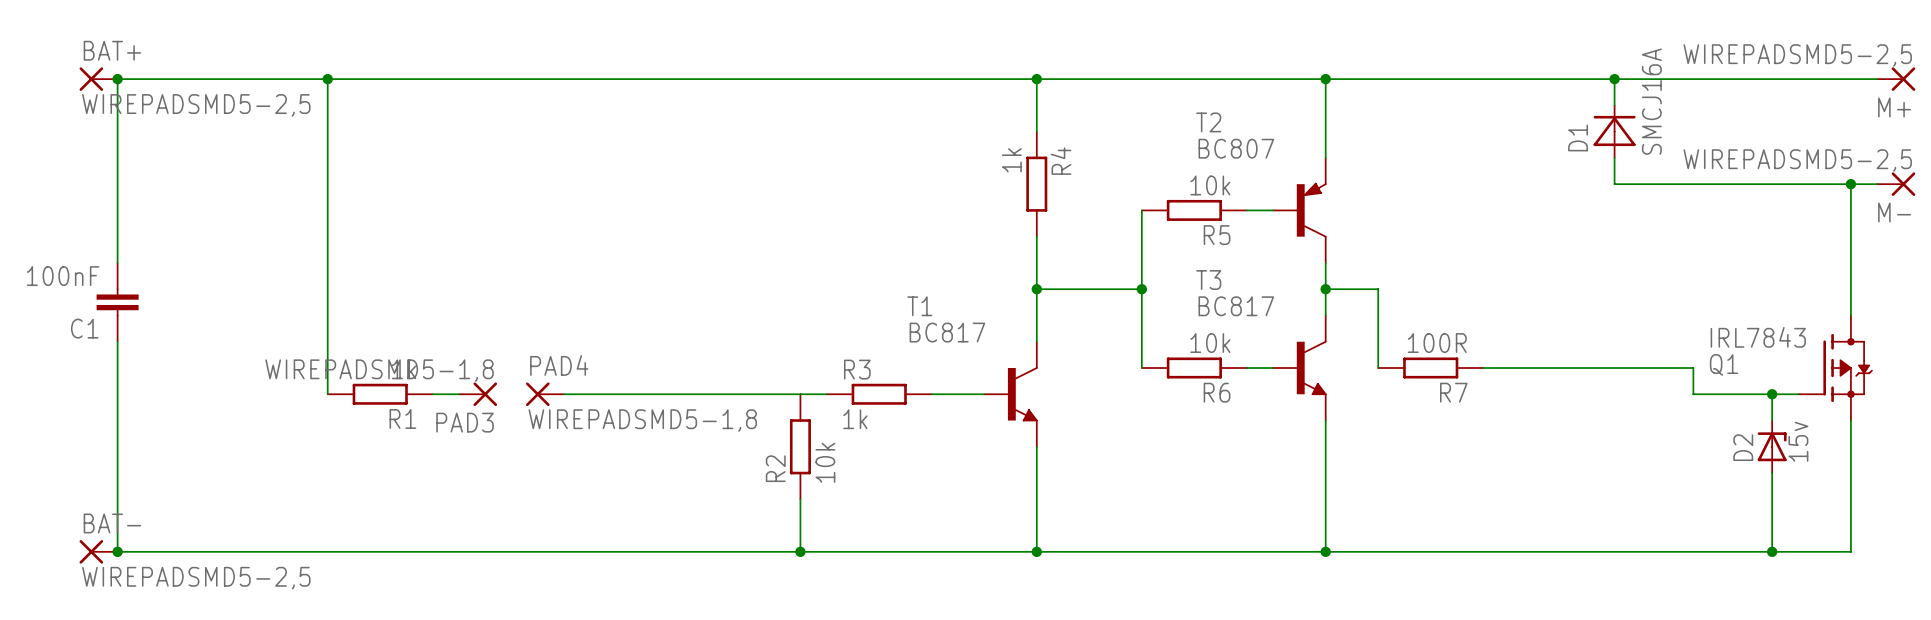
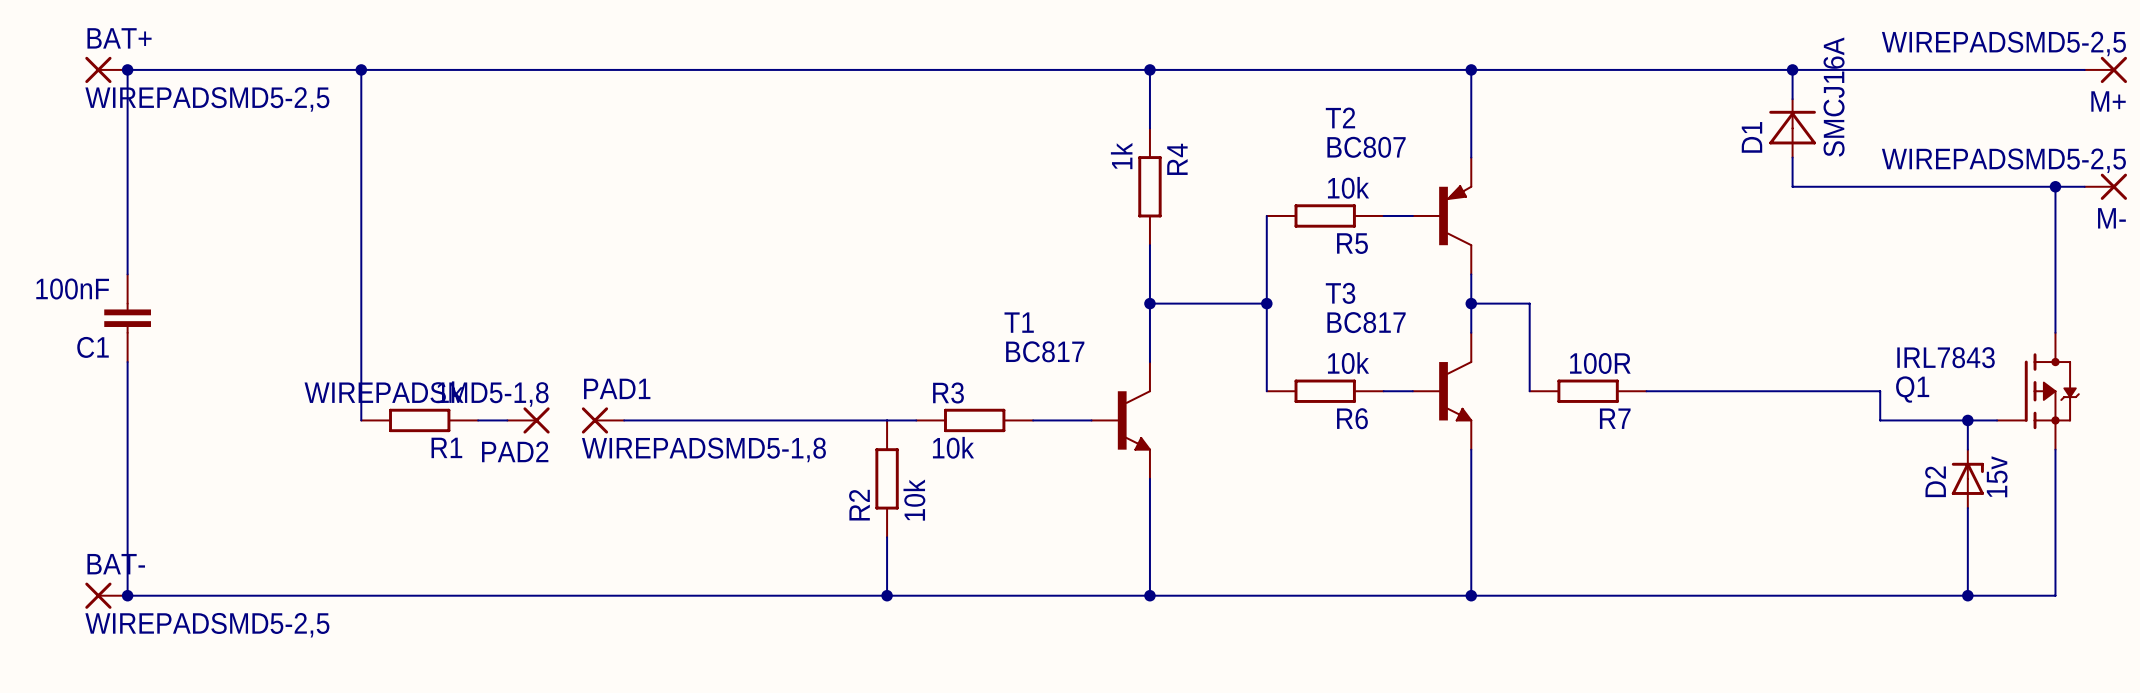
PAD4 name: PAD4 (559, 365) -> PAD1 (617, 388)
R3 value: 1k (855, 419) -> 10k (953, 447)
PAD3 name: PAD3 (465, 422) -> PAD2 (515, 451)

